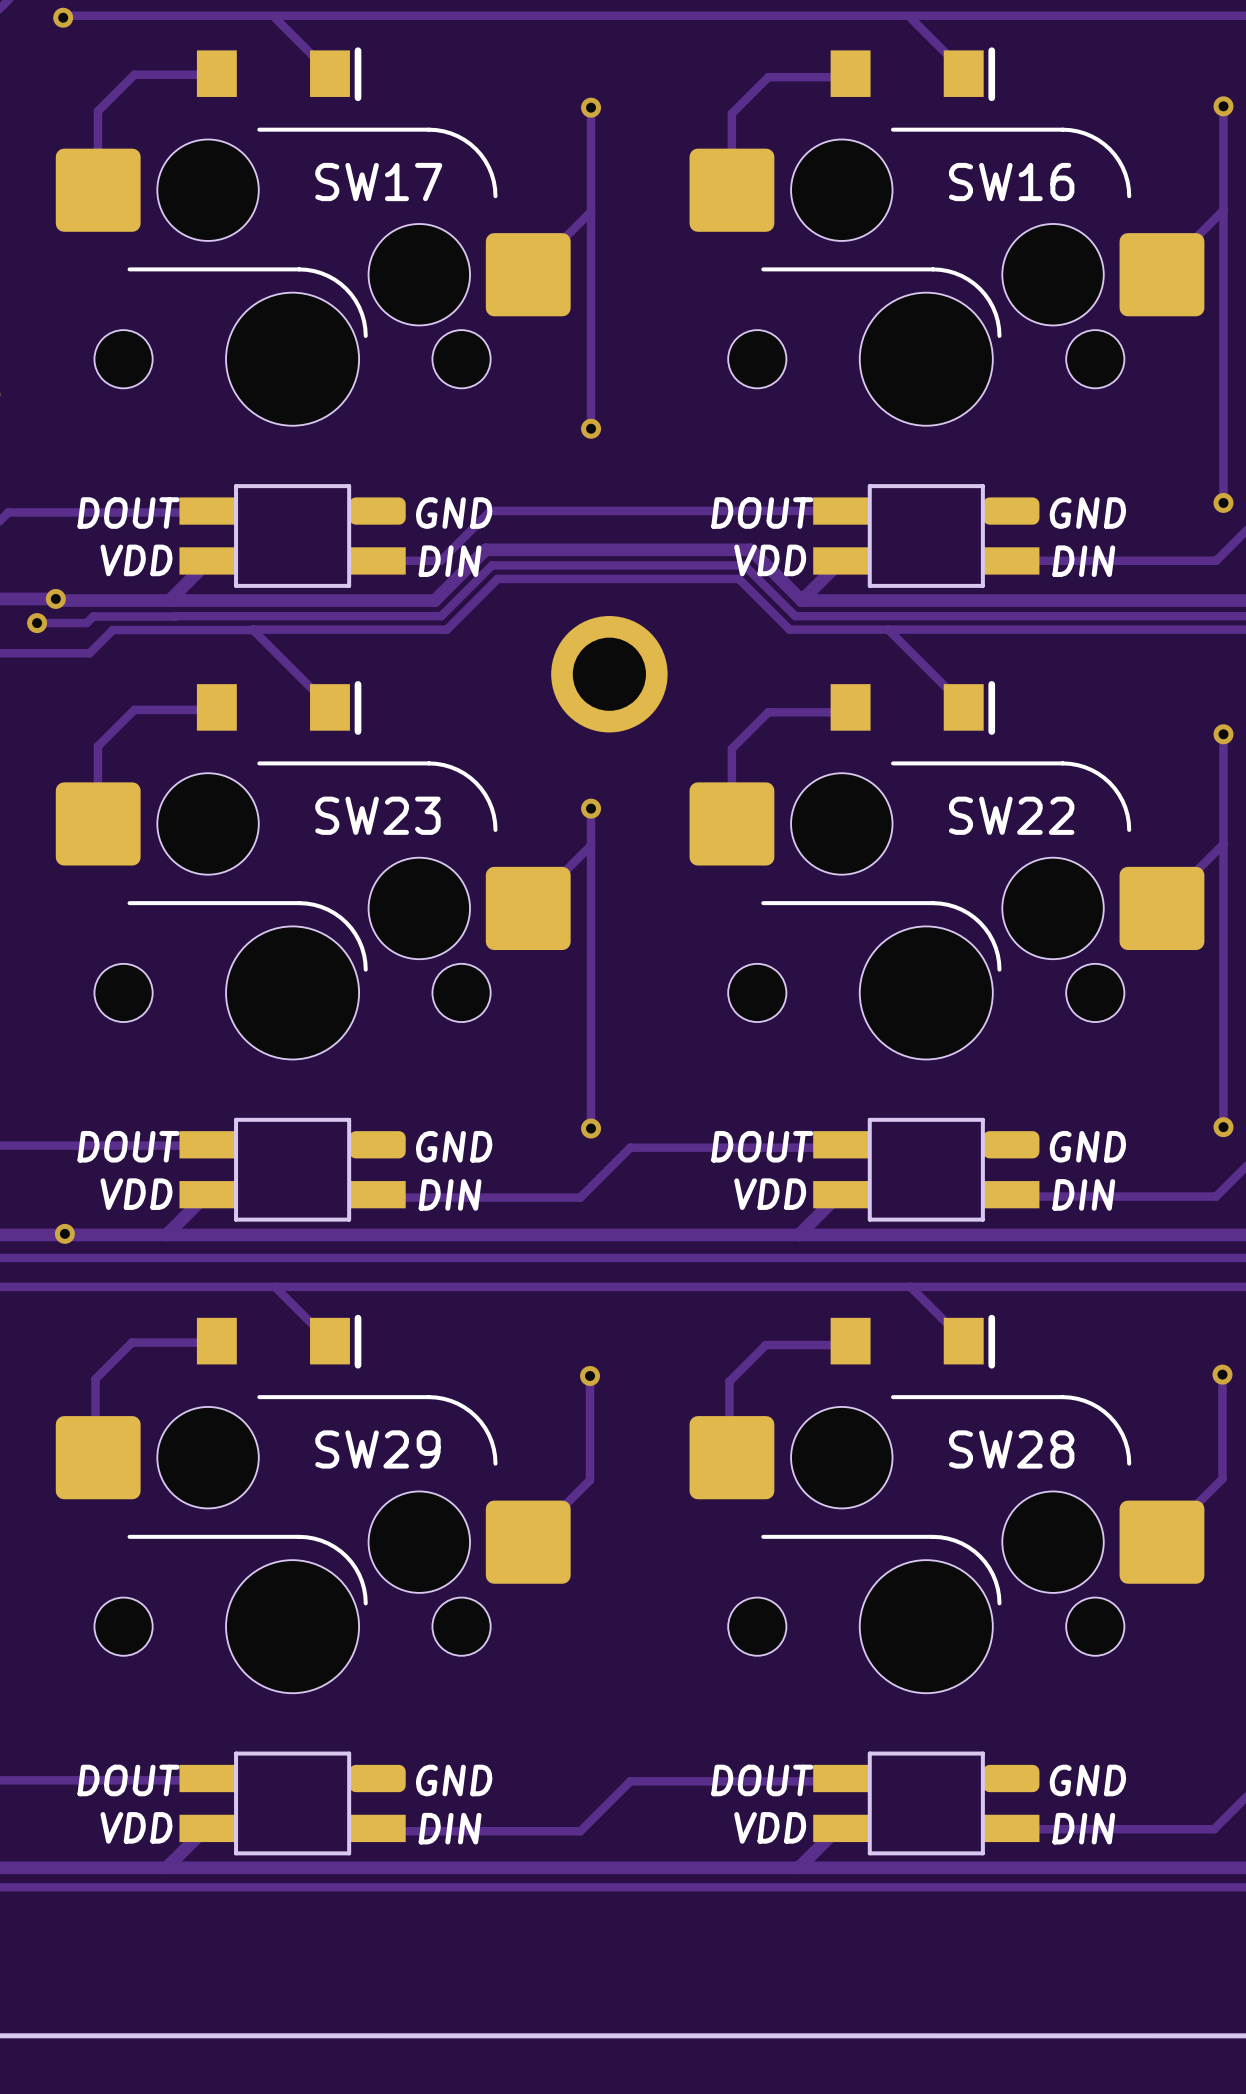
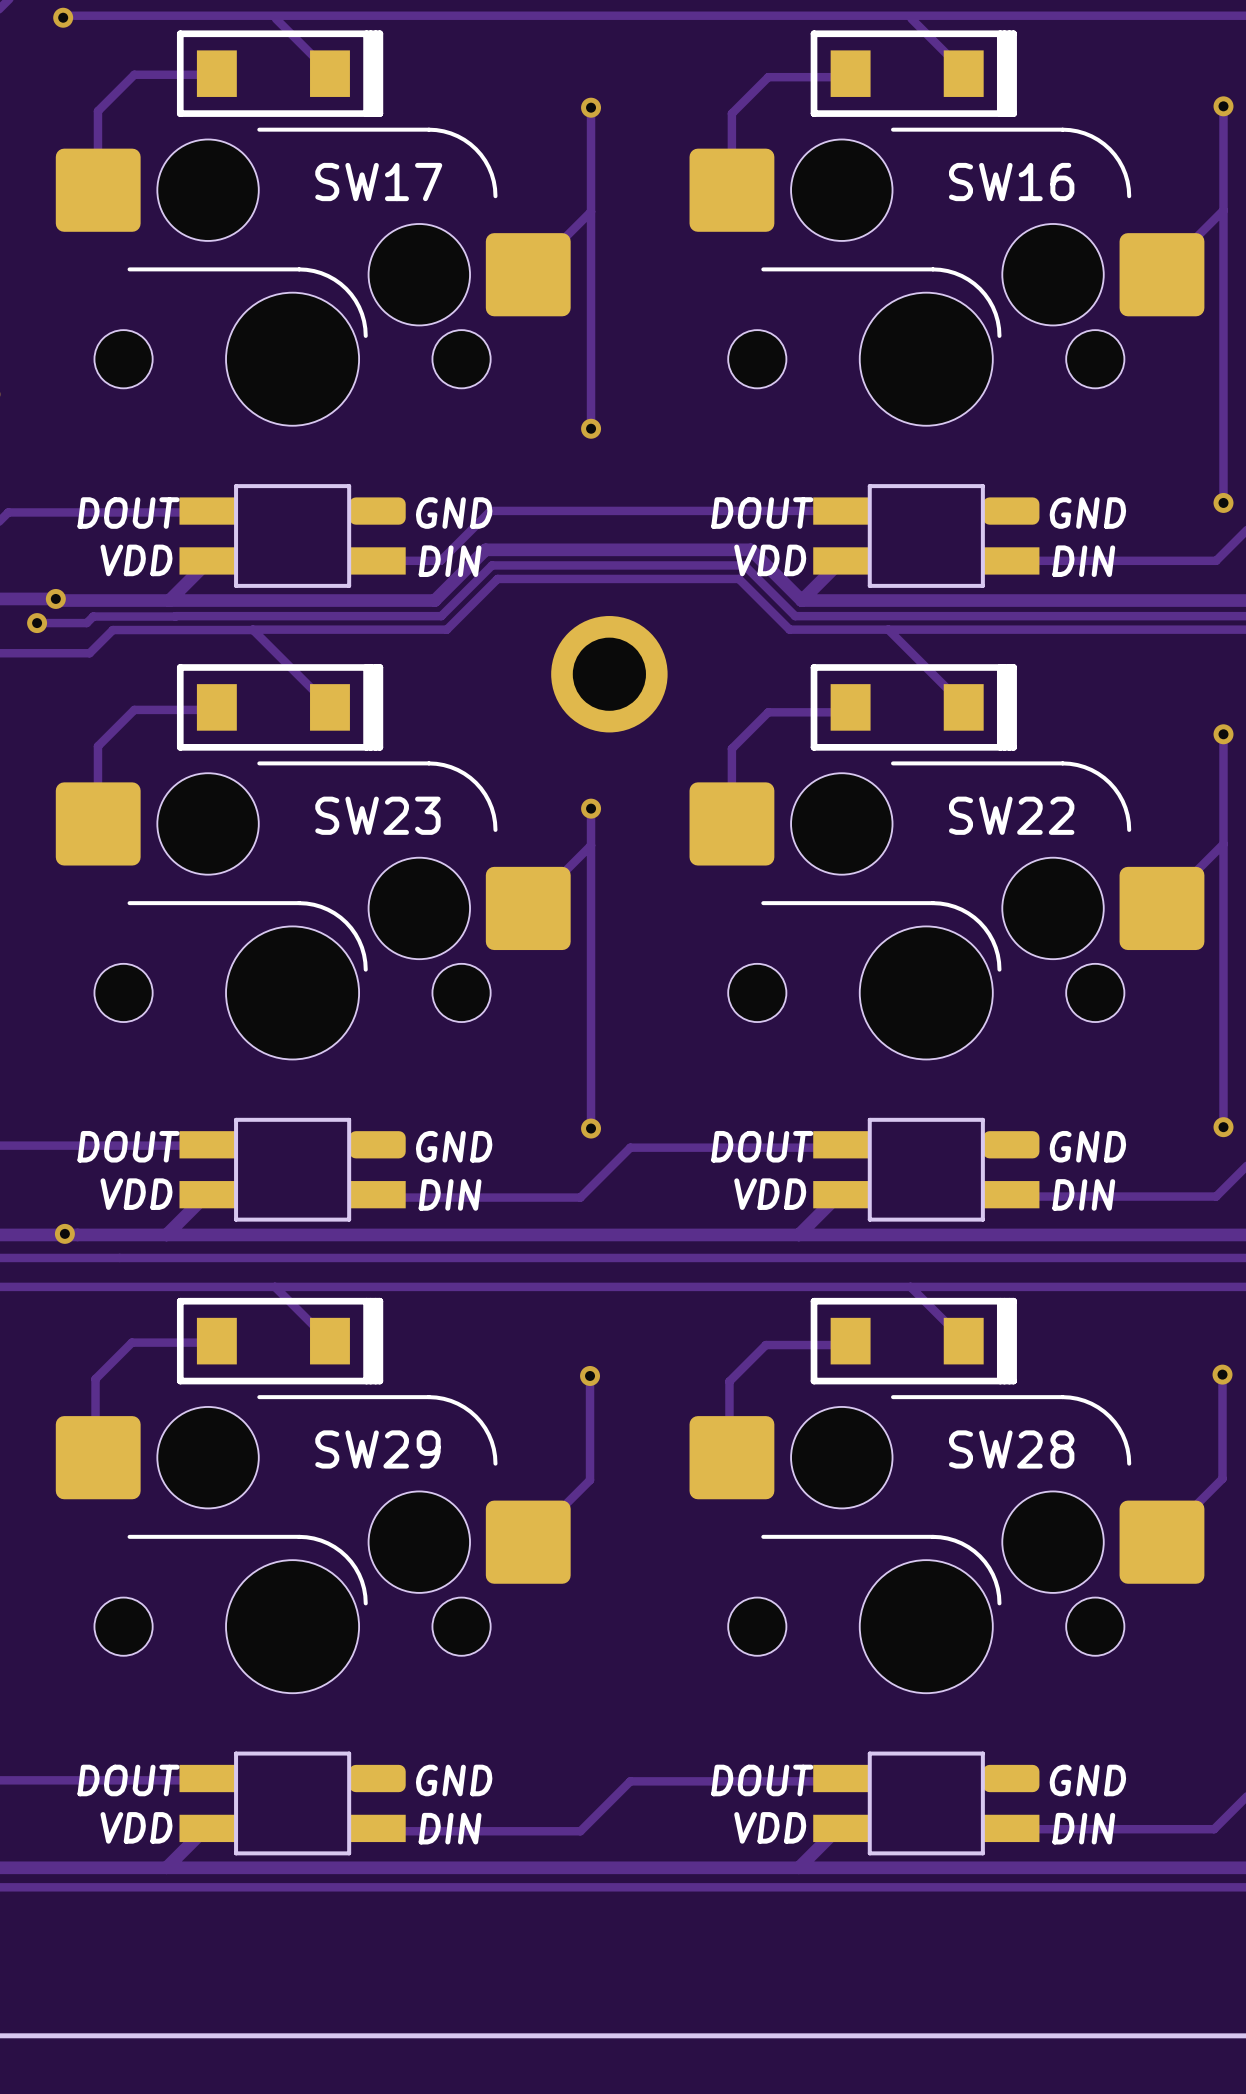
SW17 footprint: [55, 47, 571, 588] -> [55, 30, 571, 588]
SW16 footprint: [689, 47, 1205, 588] -> [689, 30, 1205, 588]
SW23 footprint: [55, 681, 571, 1222] -> [55, 664, 571, 1222]
SW22 footprint: [689, 681, 1205, 1222] -> [689, 664, 1205, 1222]
SW29 footprint: [55, 1314, 571, 1856] -> [55, 1297, 571, 1856]
SW28 footprint: [689, 1314, 1205, 1856] -> [689, 1297, 1205, 1856]

